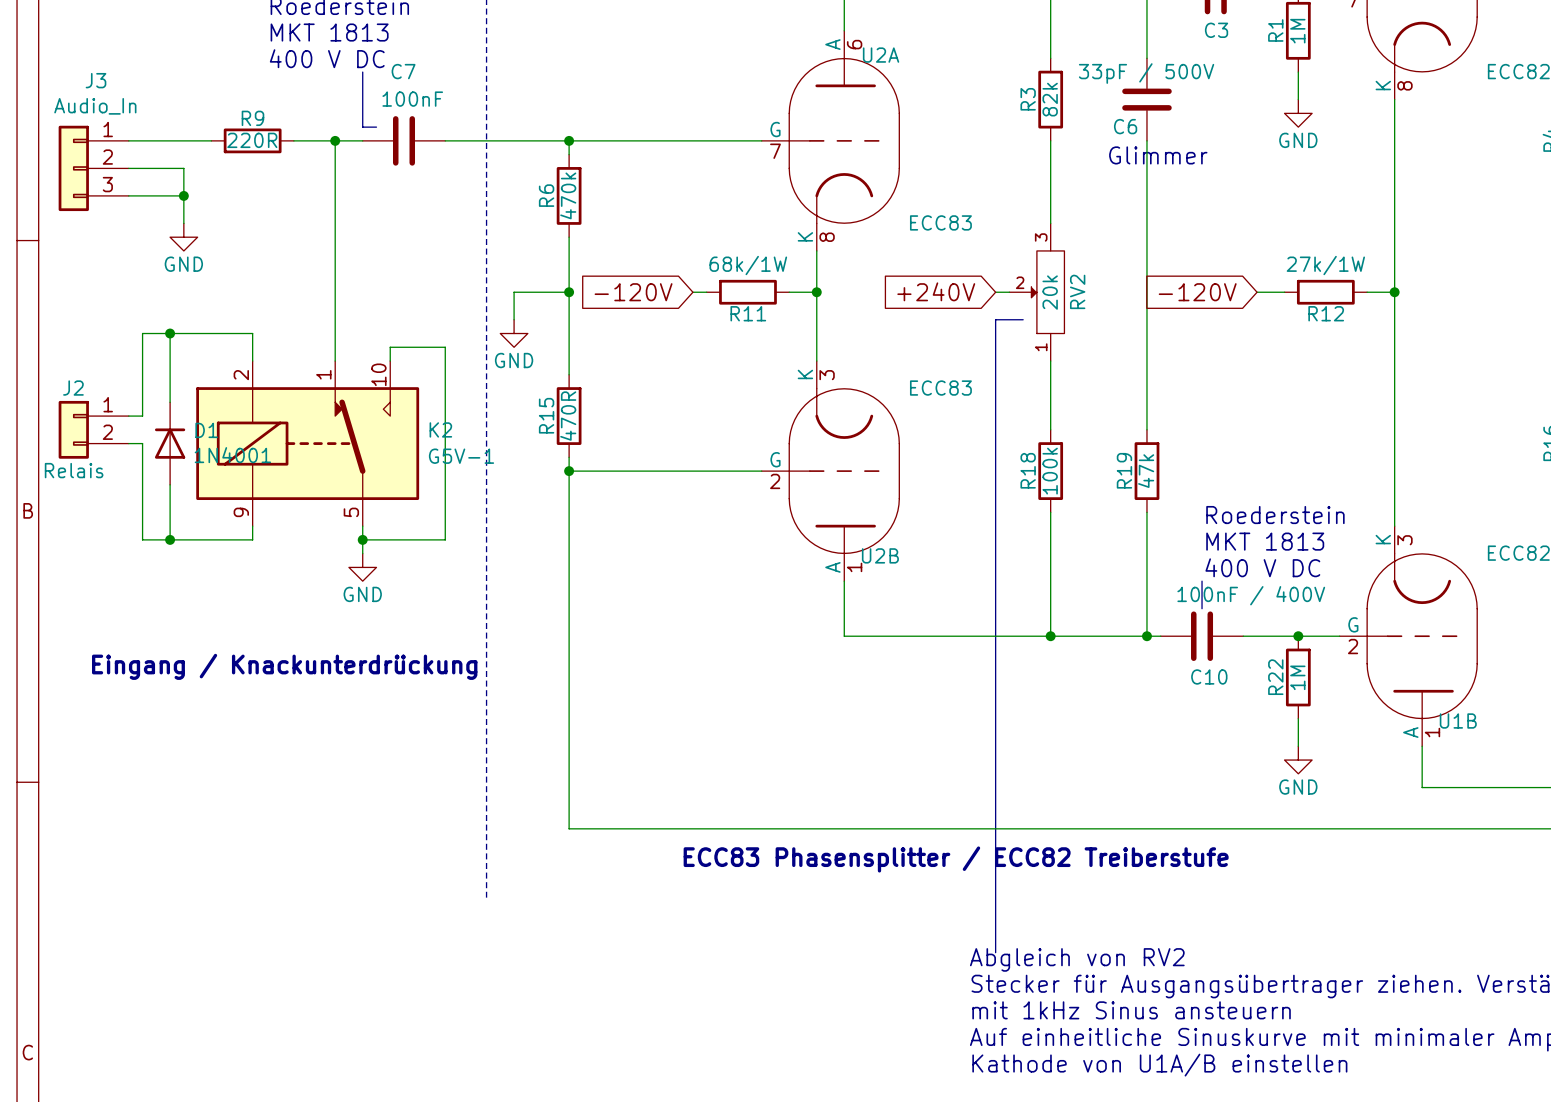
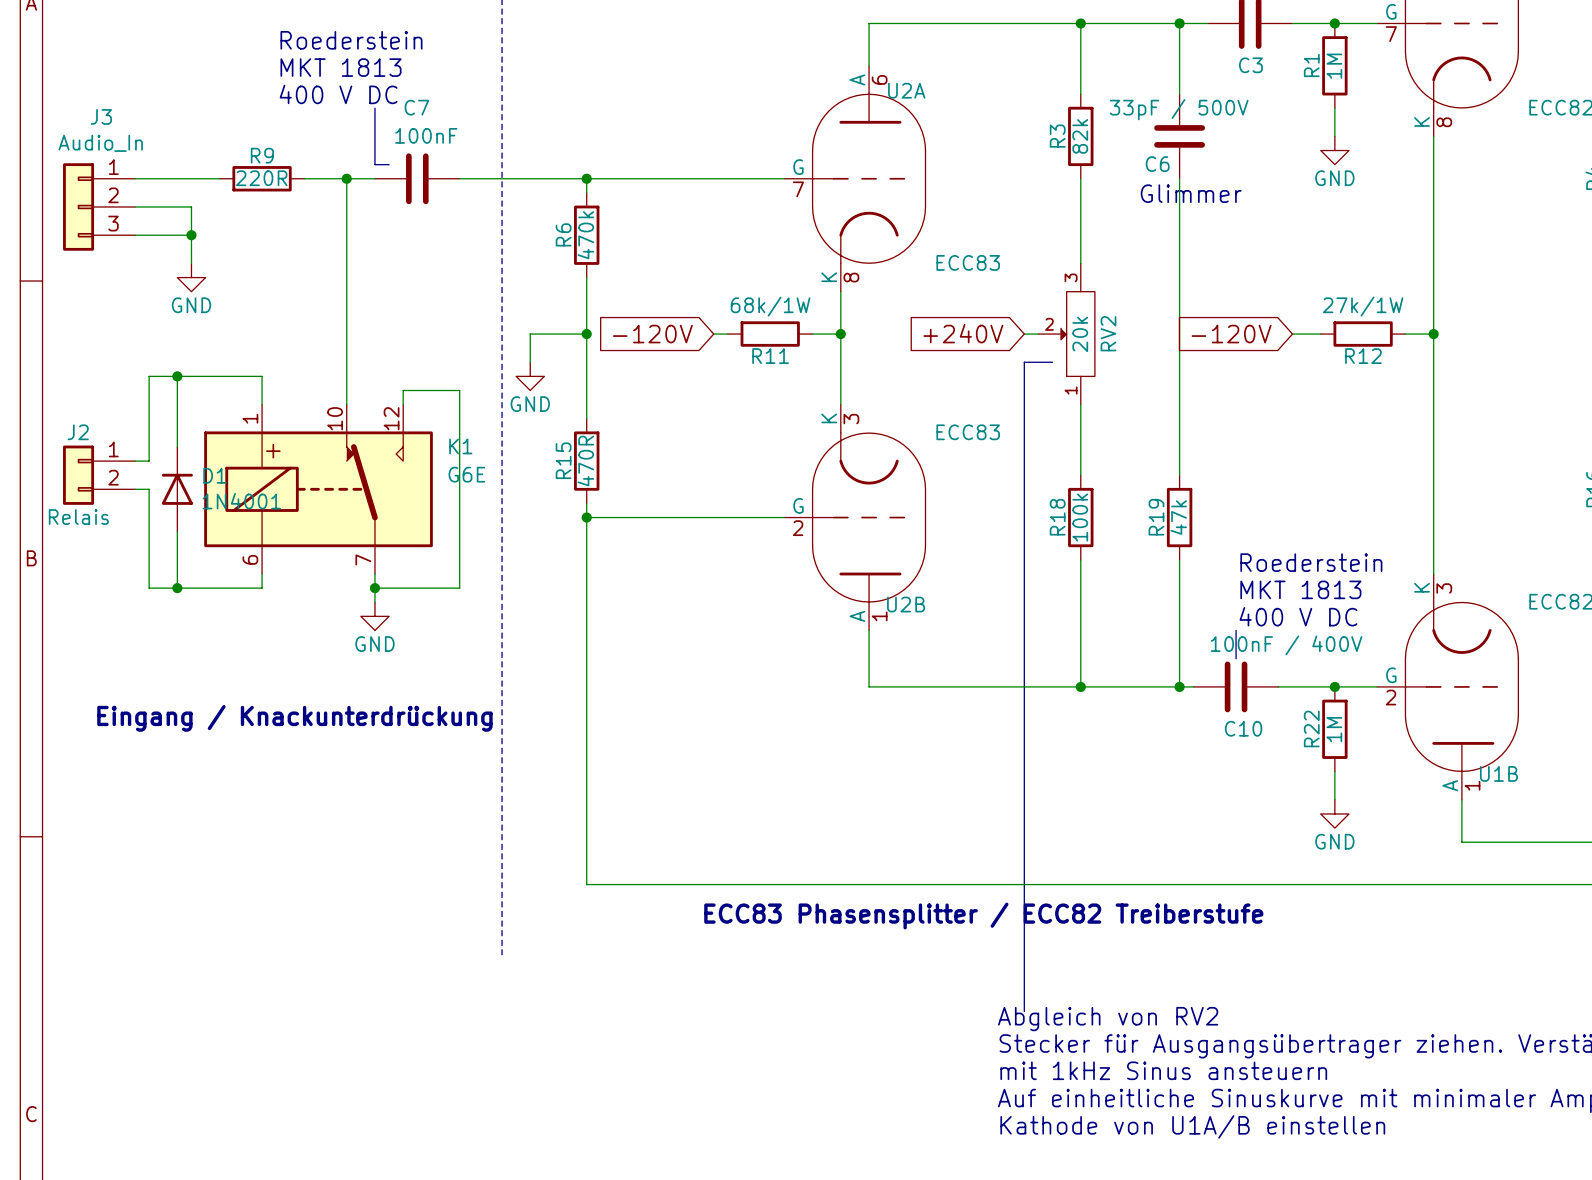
K2: G5V-1 (307, 443) -> none
K1: none -> G6E (318, 489)

